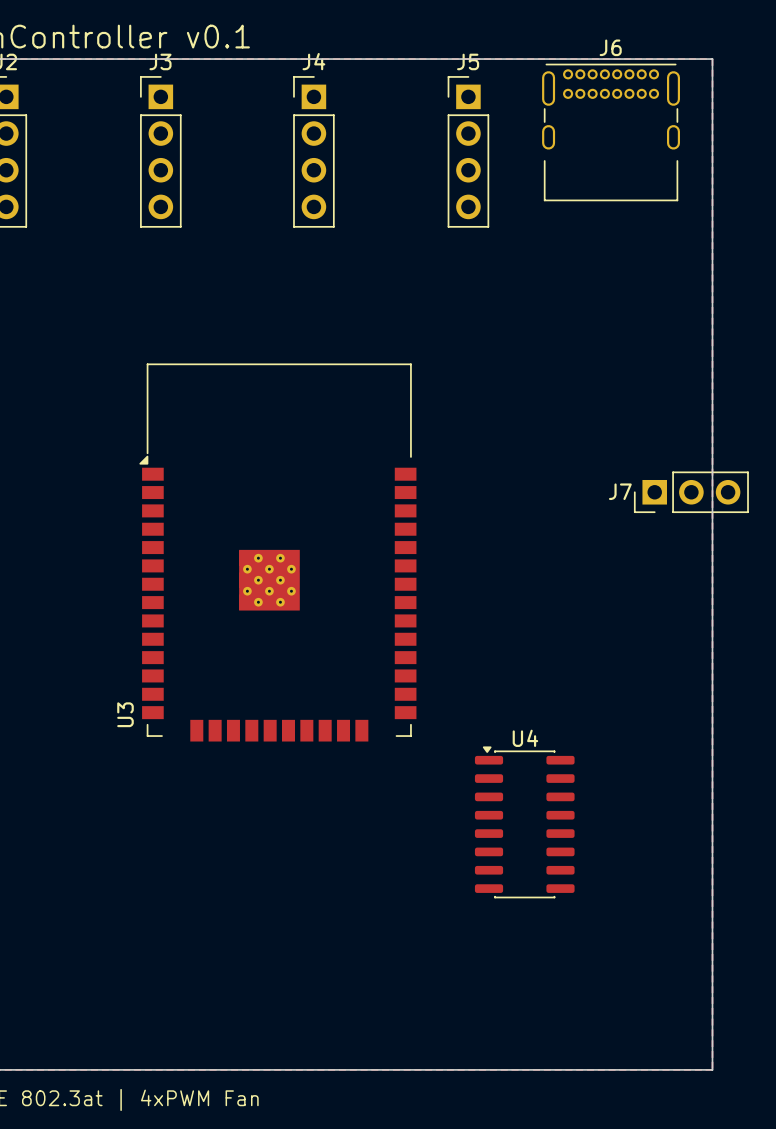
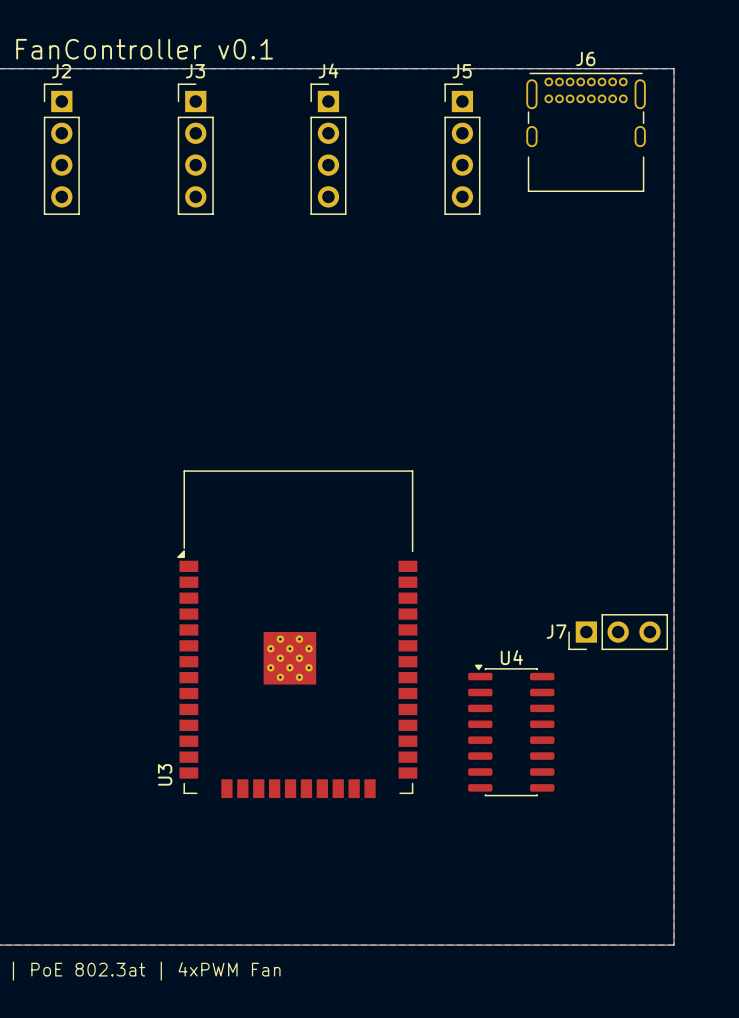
J7 position: (691, 492) -> (618, 632)
U3 position: (277, 552) -> (297, 634)

